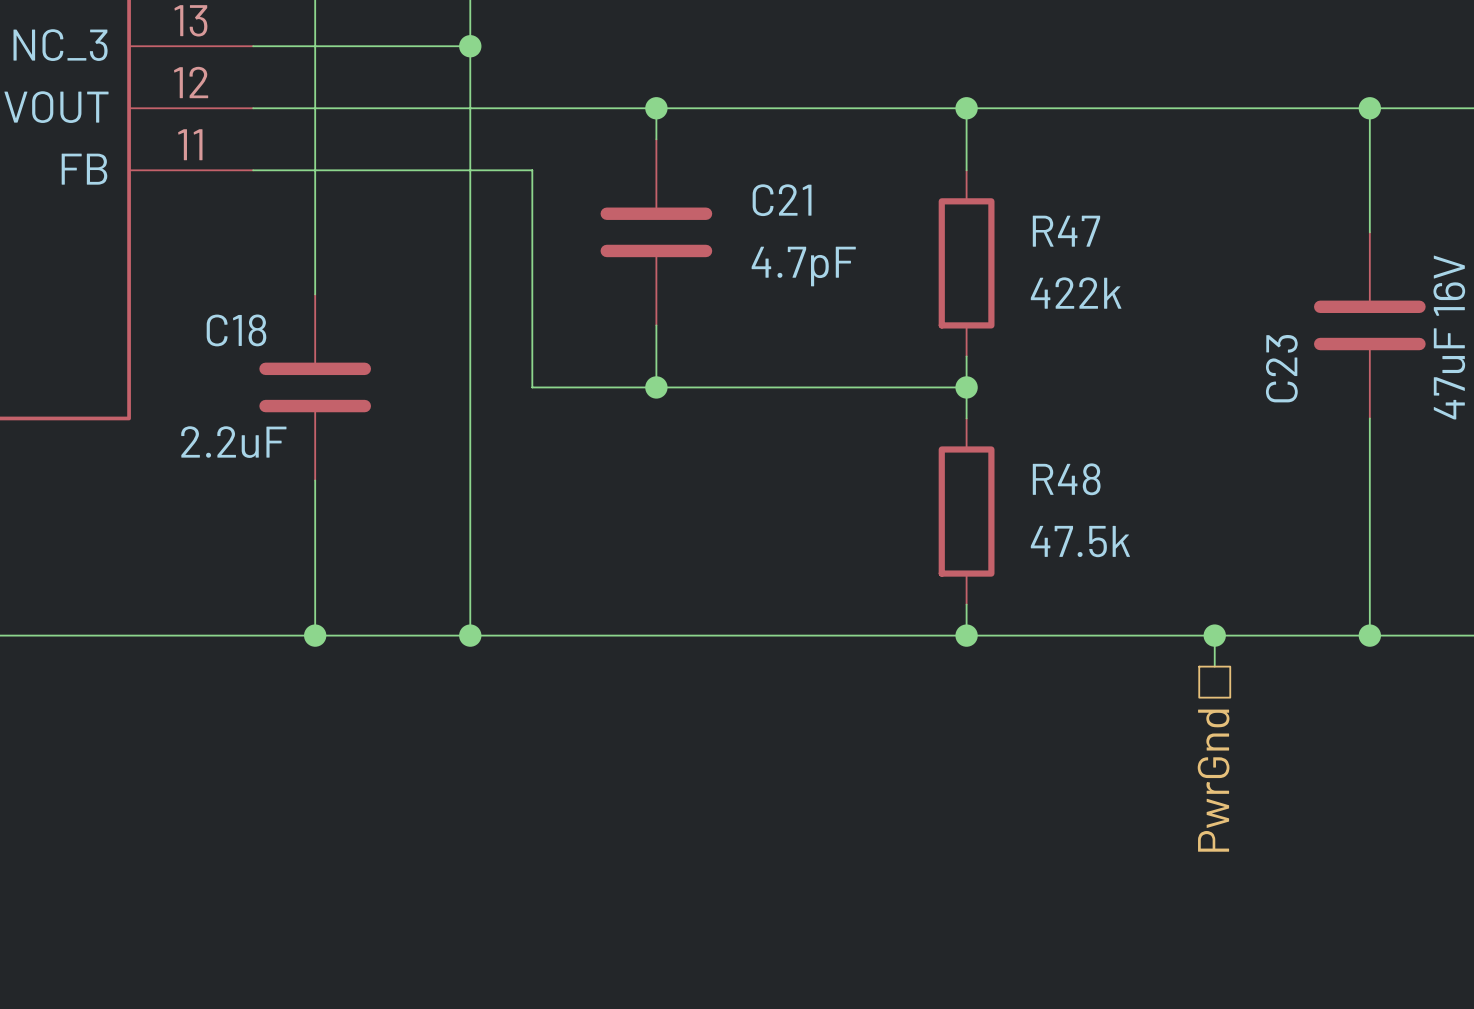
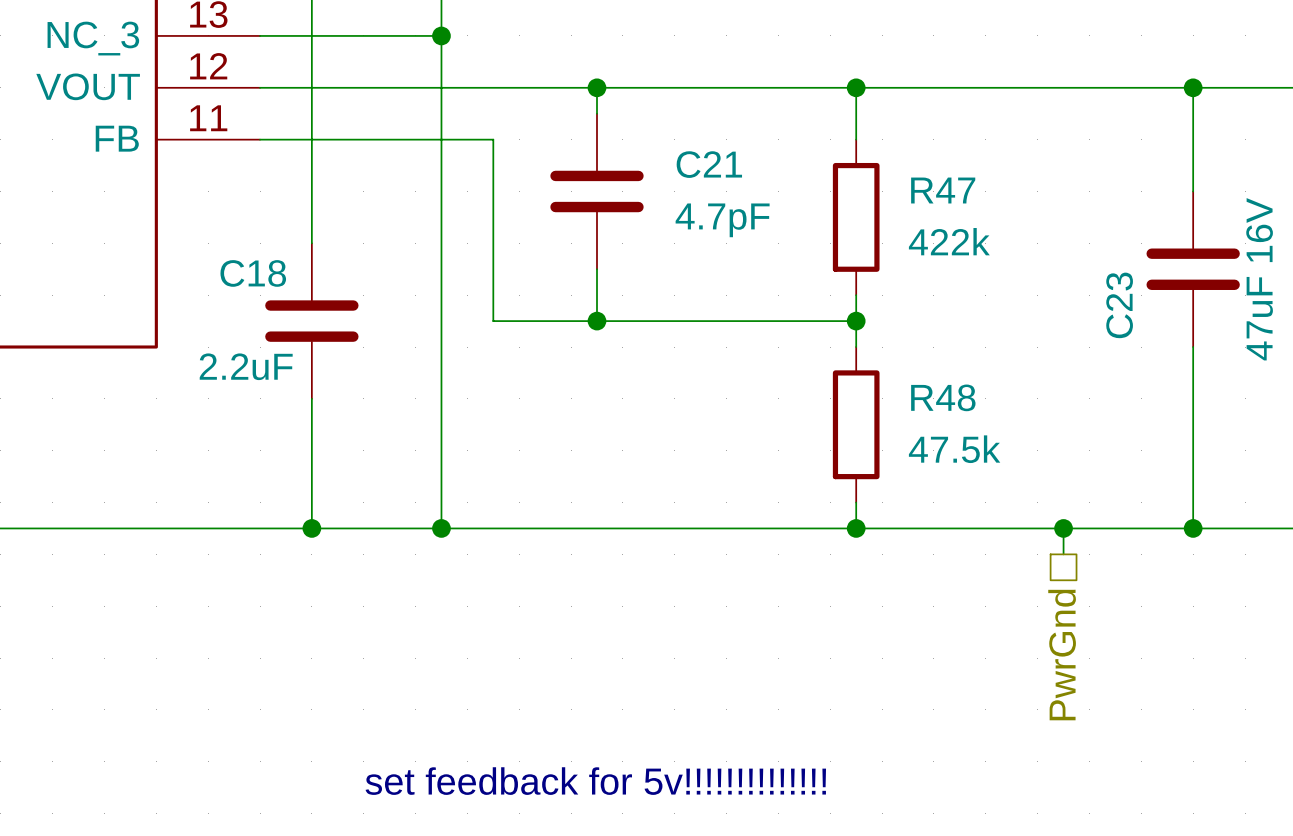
text: none -> set feedback for 5v!!!!!!!!!!!!!! (595, 781)

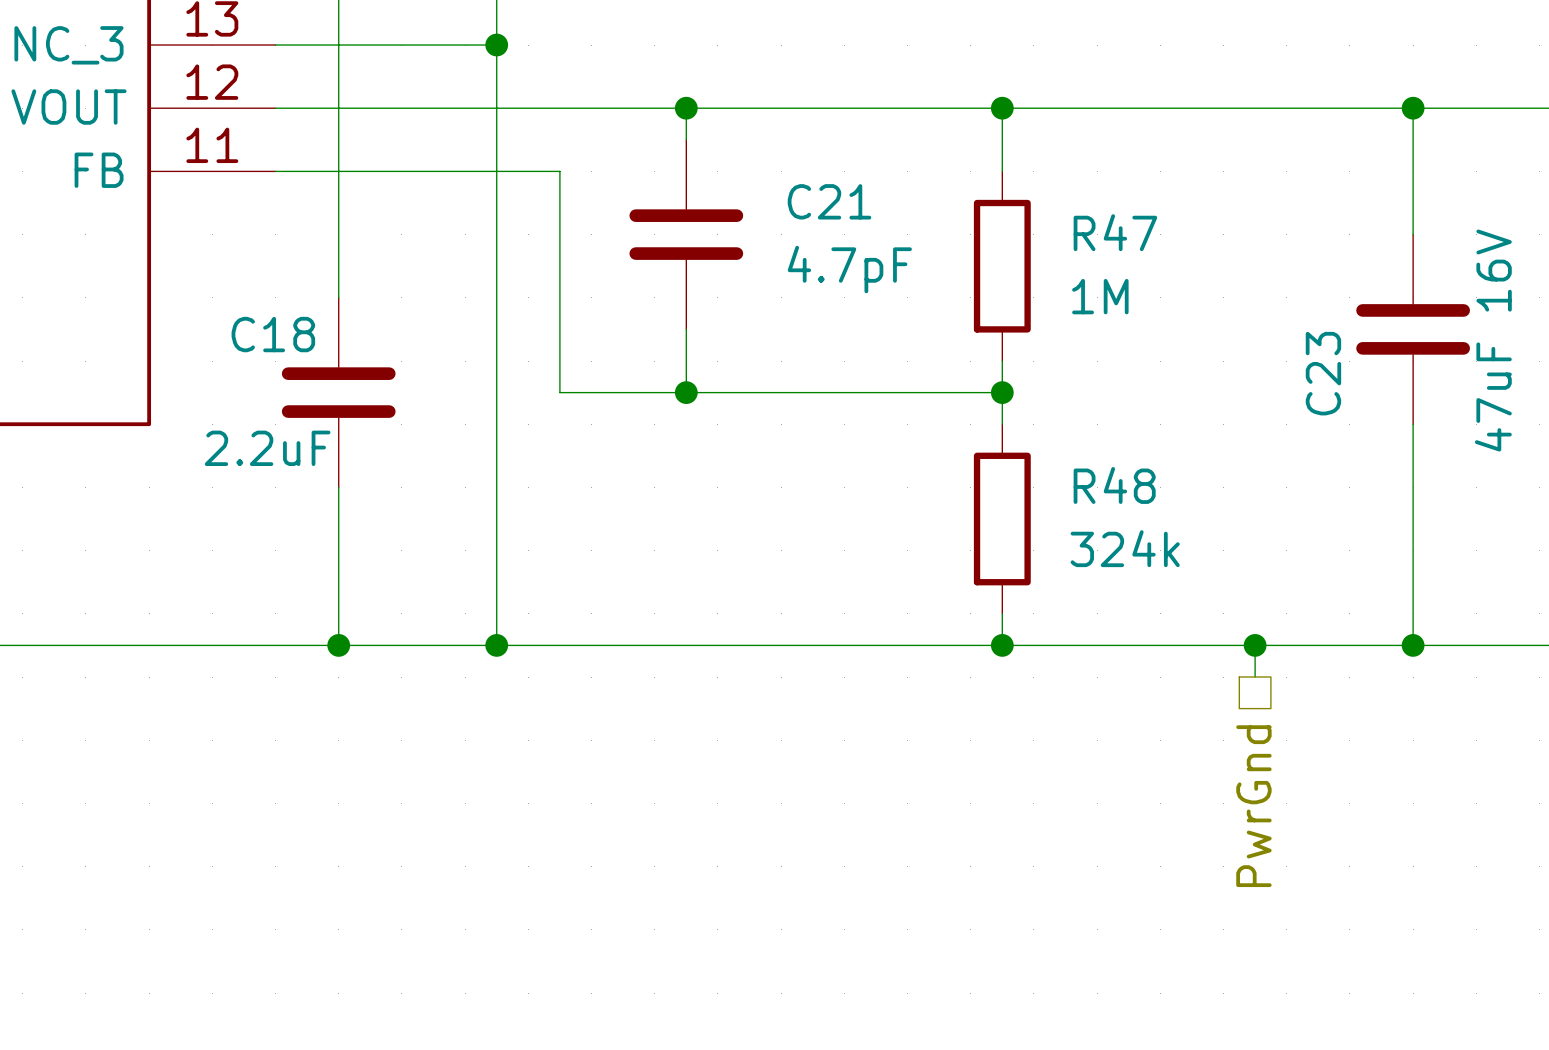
R47 value: 422k (949, 241) -> 1M (1100, 296)
R48 value: 47.5k (954, 449) -> 324k (1125, 548)
text: set feedback for 5v!!!!!!!!!!!!!! (595, 781) -> none

